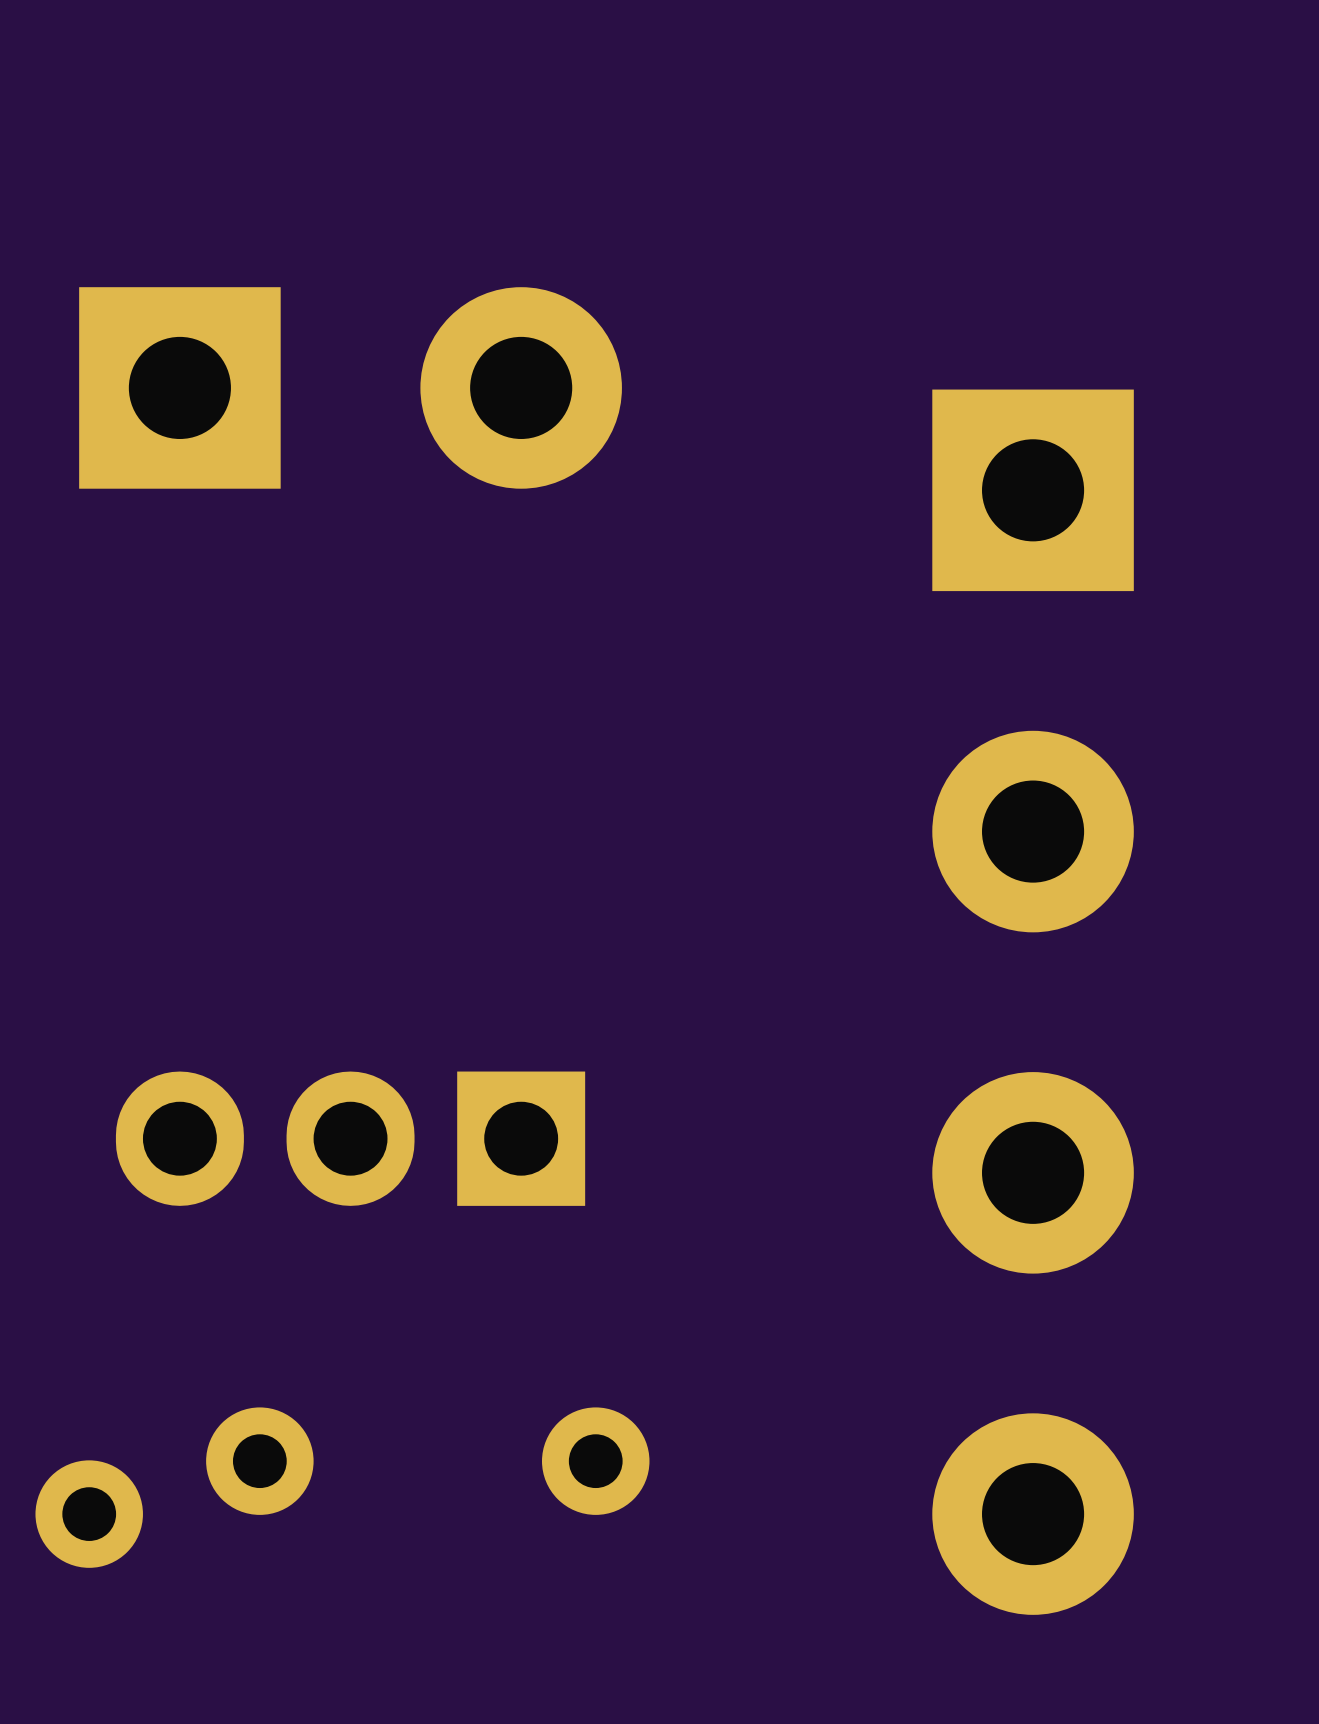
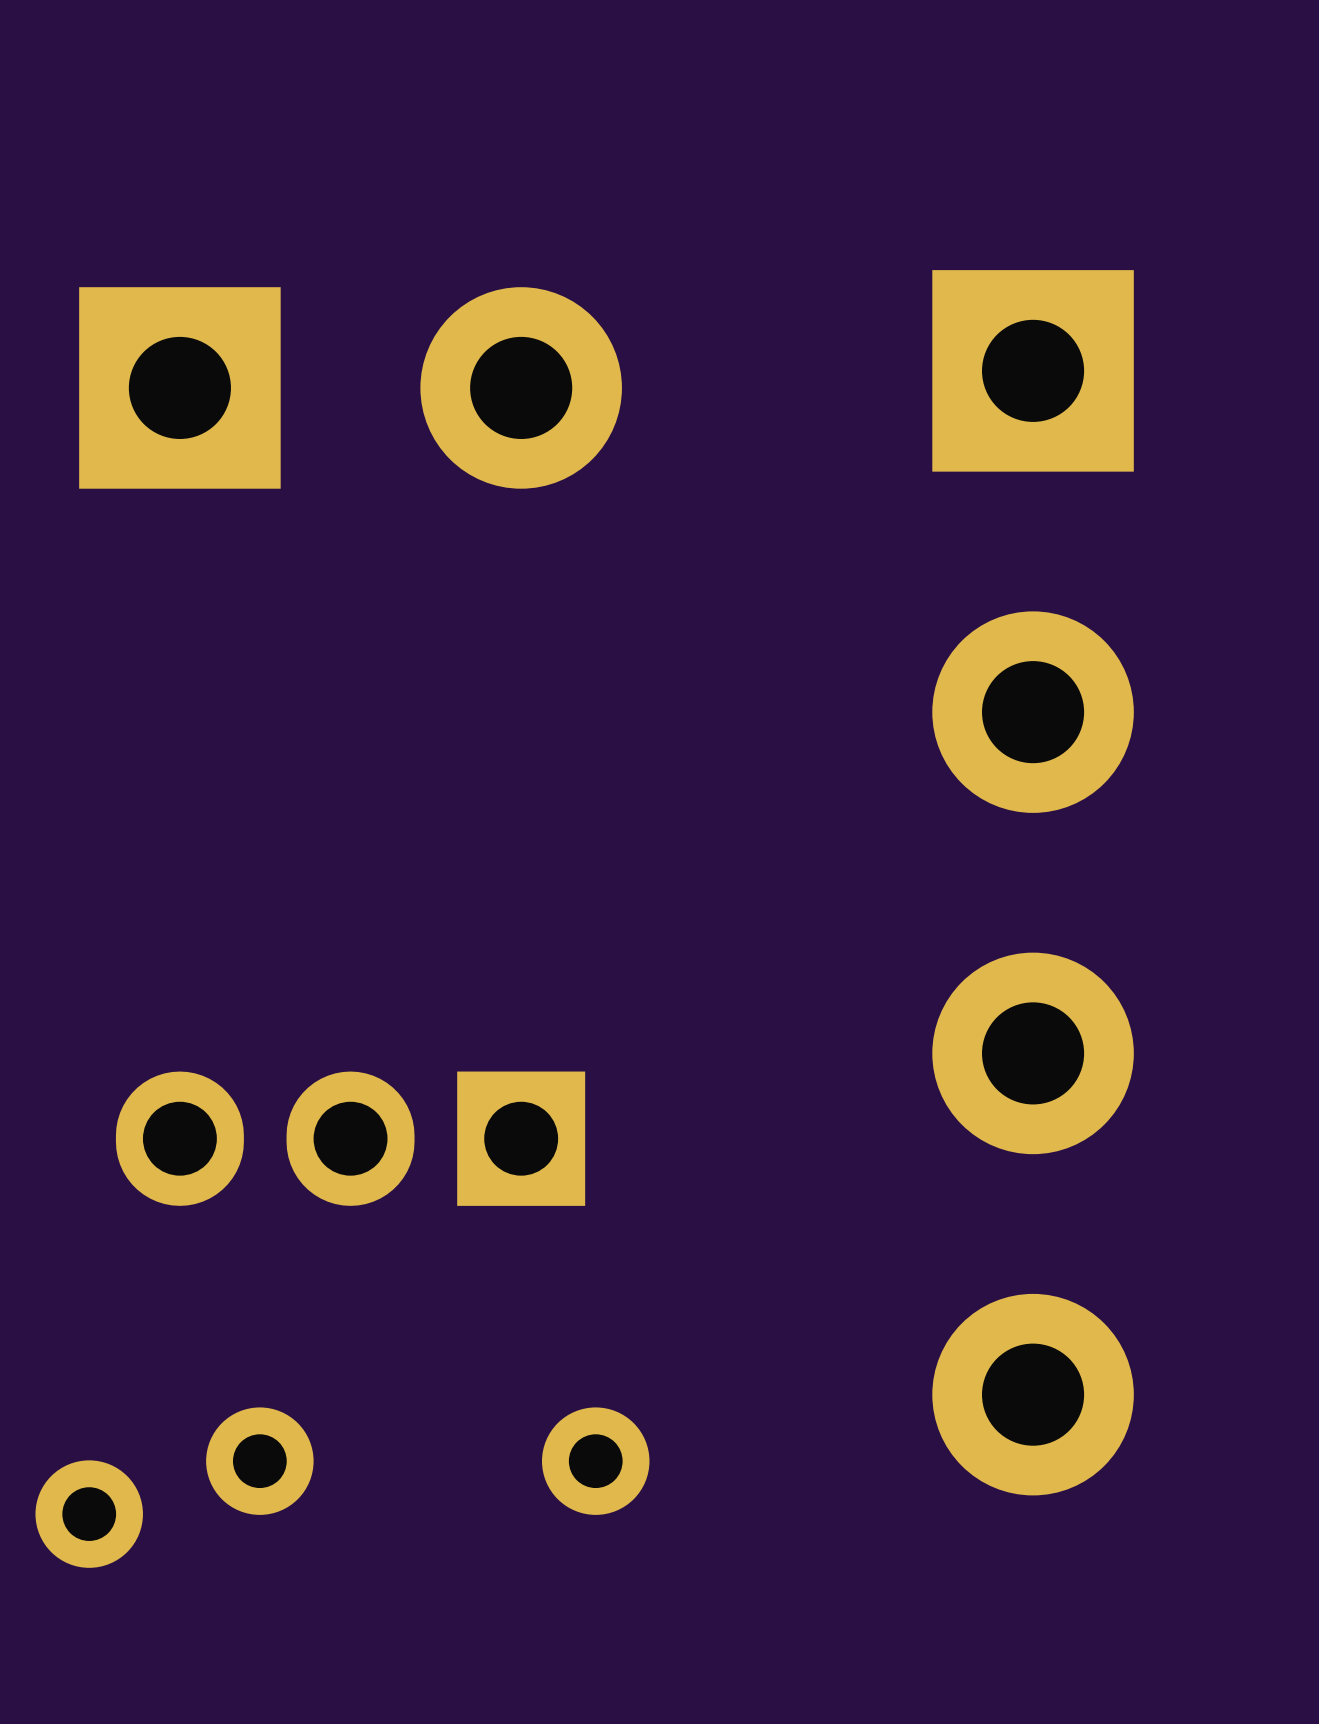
part position: (1033, 1002) -> (1033, 882)

